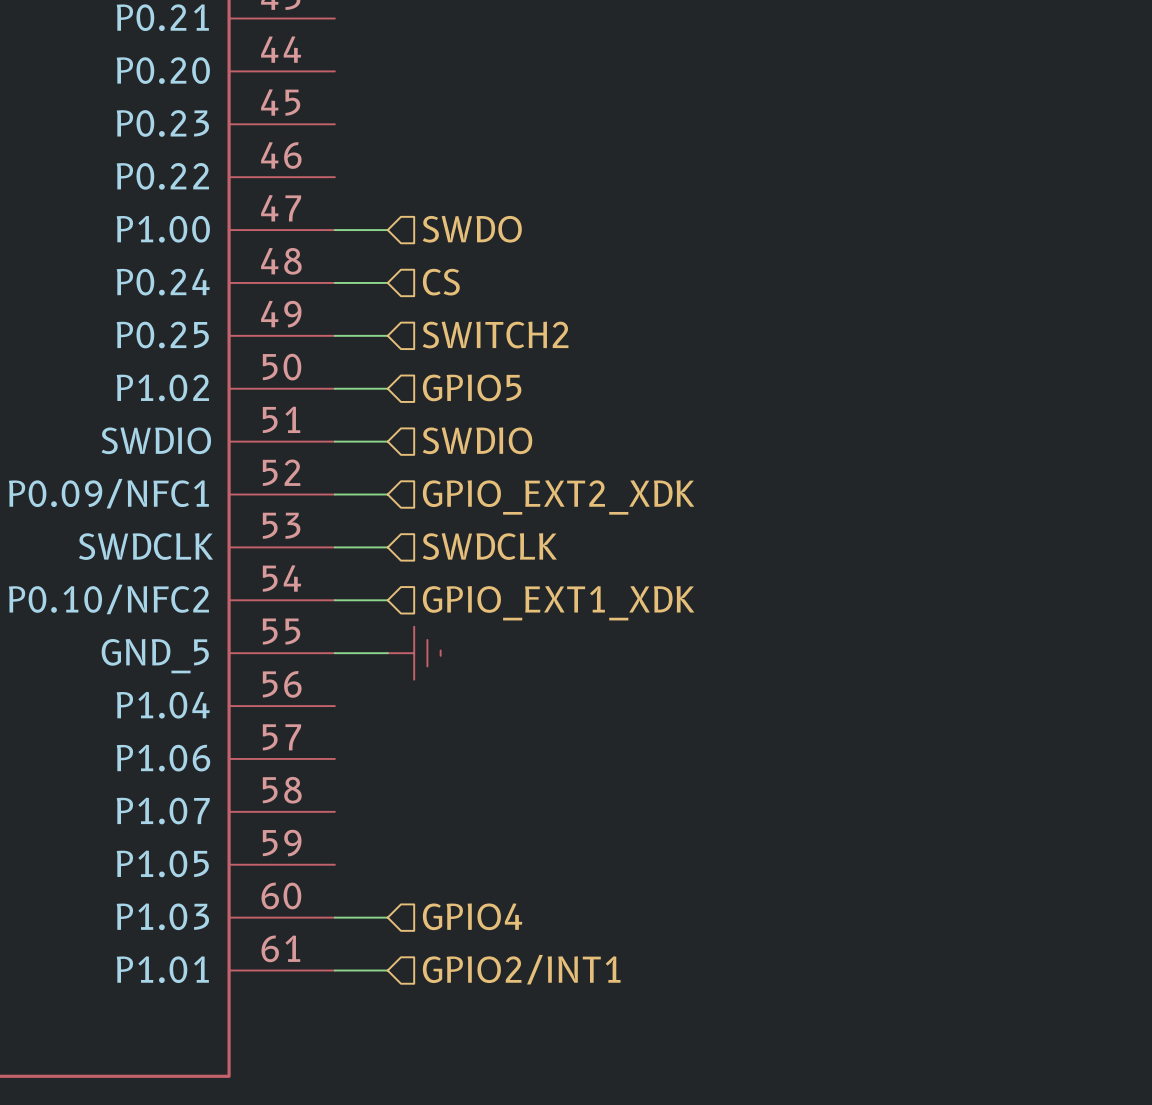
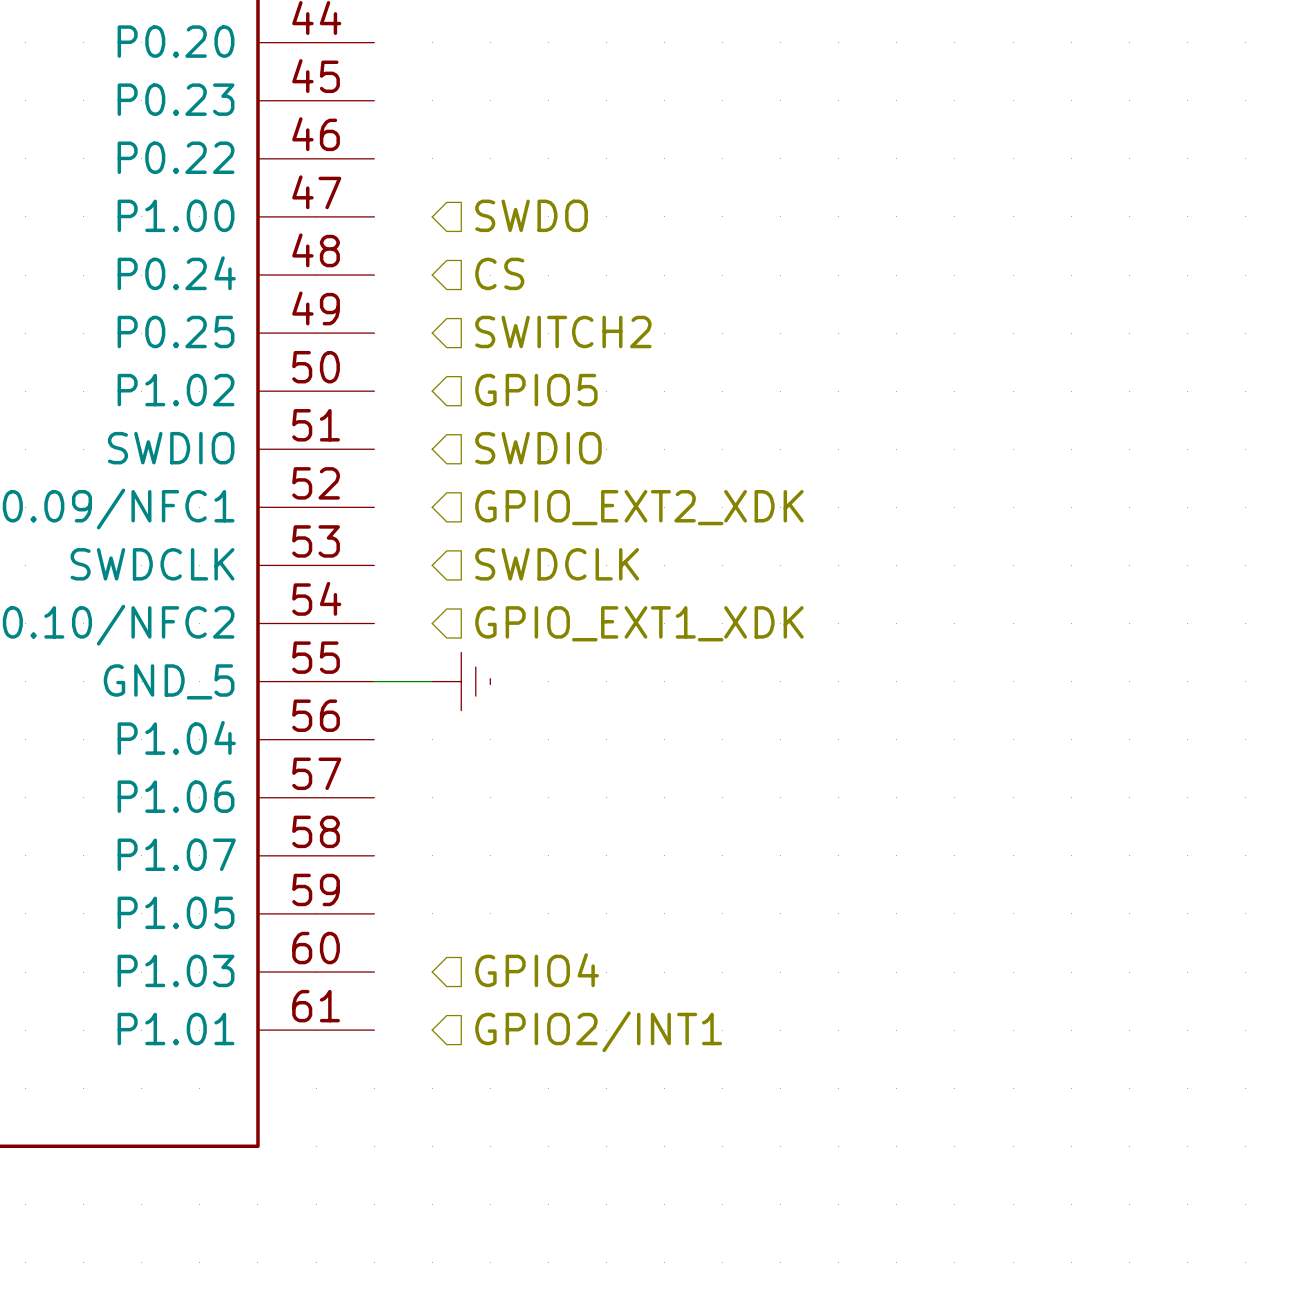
wire: (334, 230) (387, 230) -> none
wire: (334, 282) (387, 282) -> none
wire: (334, 335) (387, 335) -> none
wire: (334, 388) (387, 388) -> none
wire: (334, 441) (387, 441) -> none
wire: (334, 494) (387, 494) -> none
wire: (334, 547) (387, 547) -> none
wire: (334, 600) (387, 600) -> none
wire: (334, 917) (387, 917) -> none
wire: (334, 970) (387, 970) -> none

